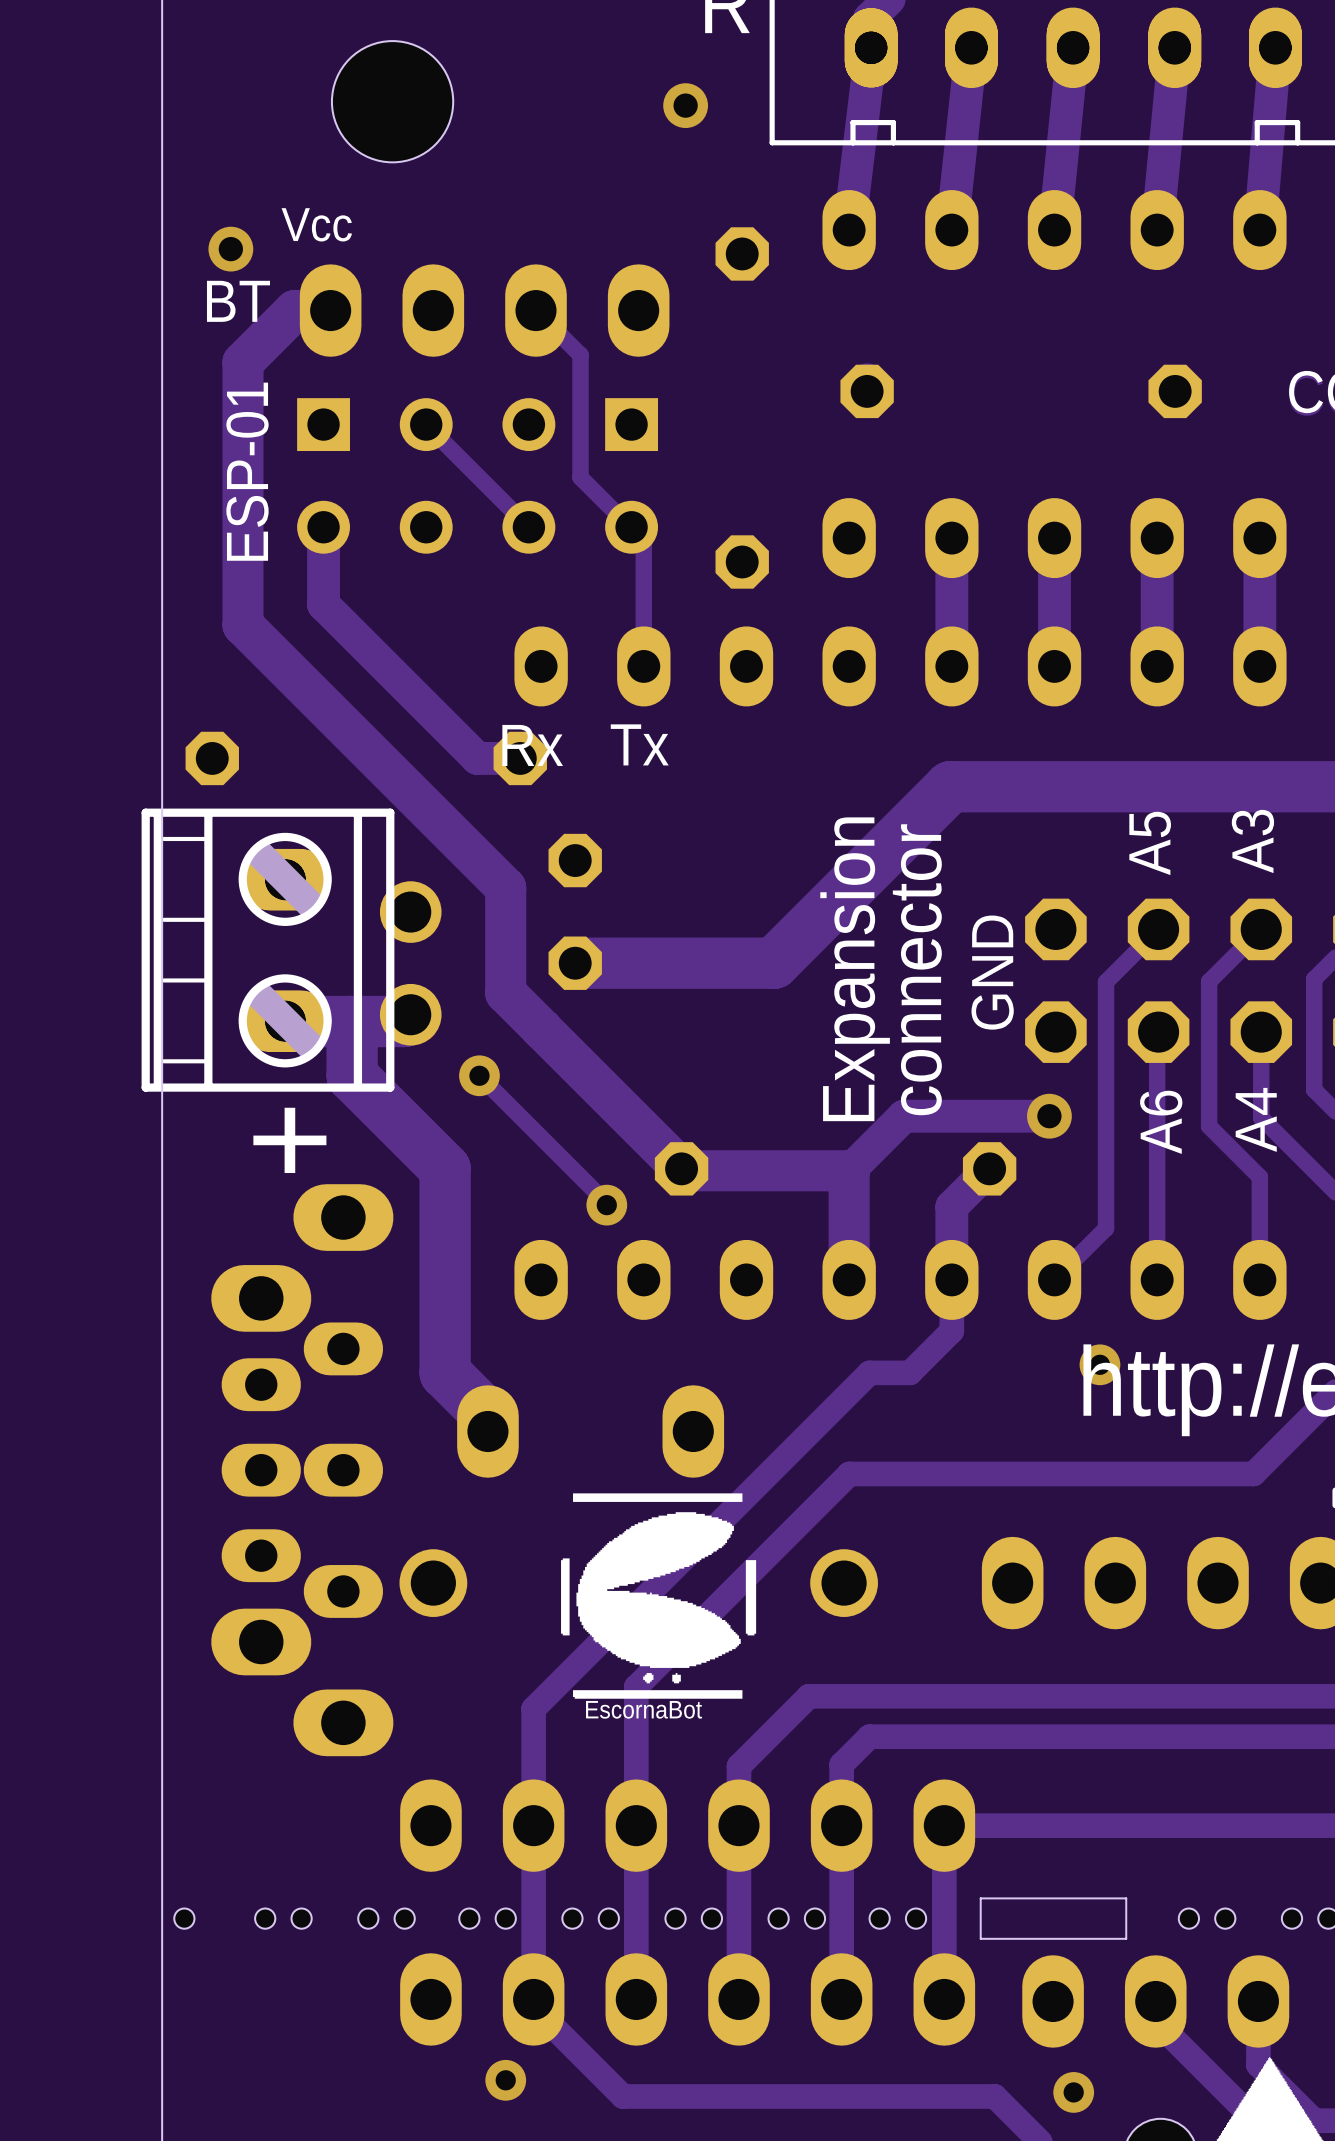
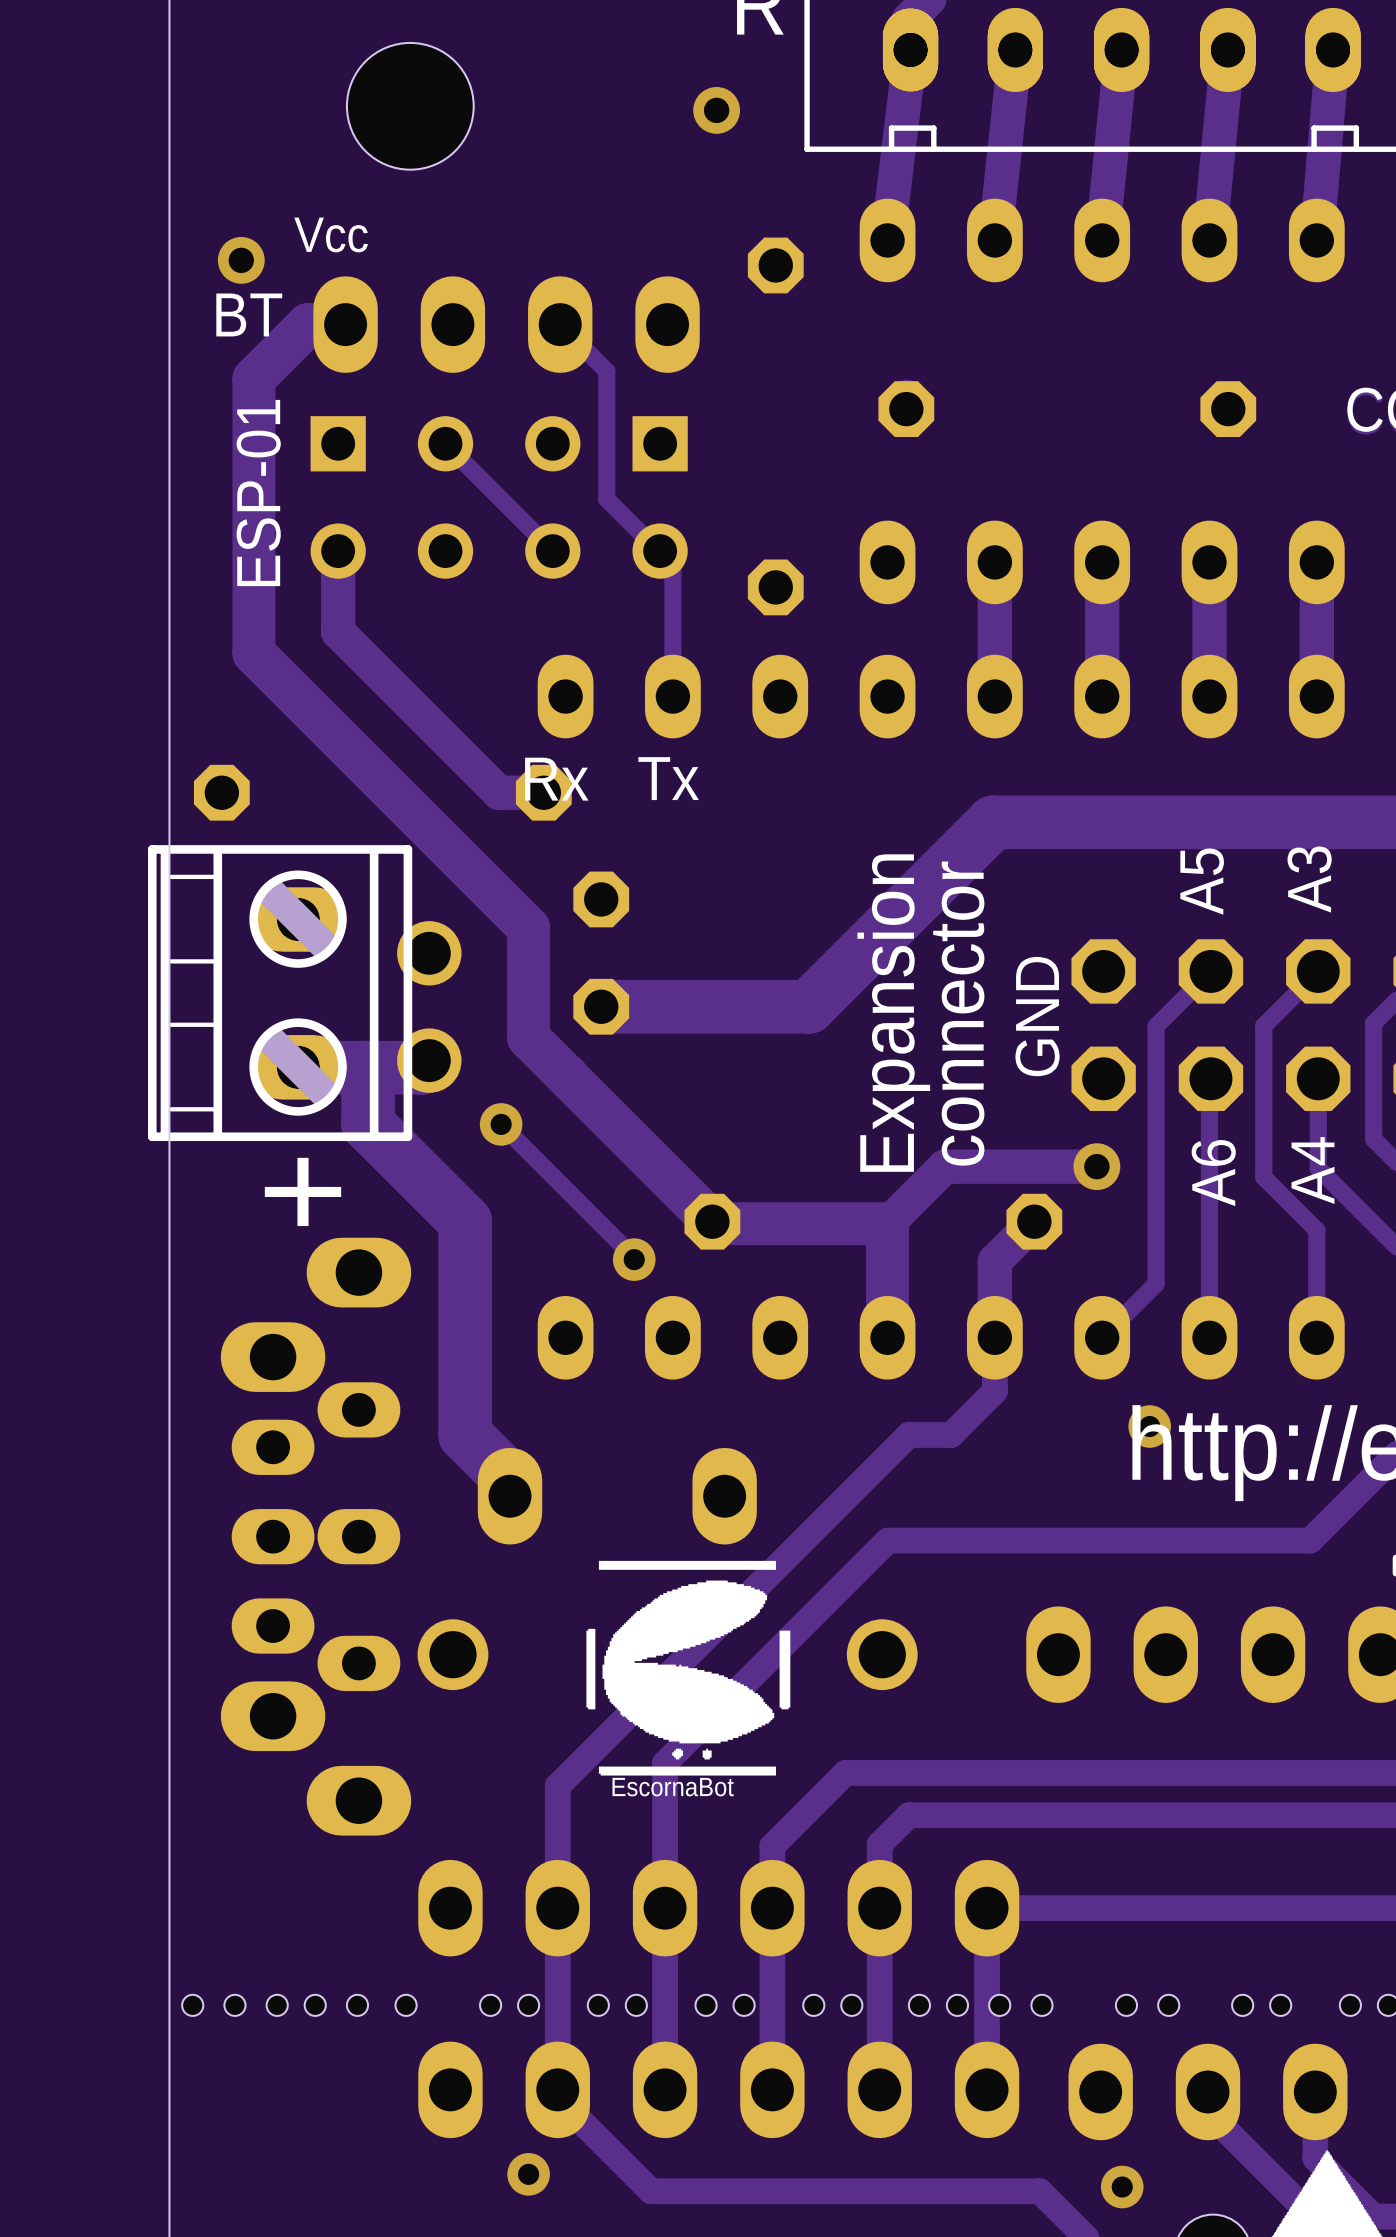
board edge: (1126, 1898) (980, 1898) (980, 1938) (1126, 1938) (1126, 1898) -> none
hole: none -> (234, 2005)
hole: none -> (357, 2005)
hole: (368, 1918) -> none
hole: none -> (406, 2005)
hole: (404, 1918) -> none
hole: none -> (999, 2005)
hole: none -> (1041, 2005)
hole: none -> (1126, 2005)
hole: none -> (1168, 2005)

